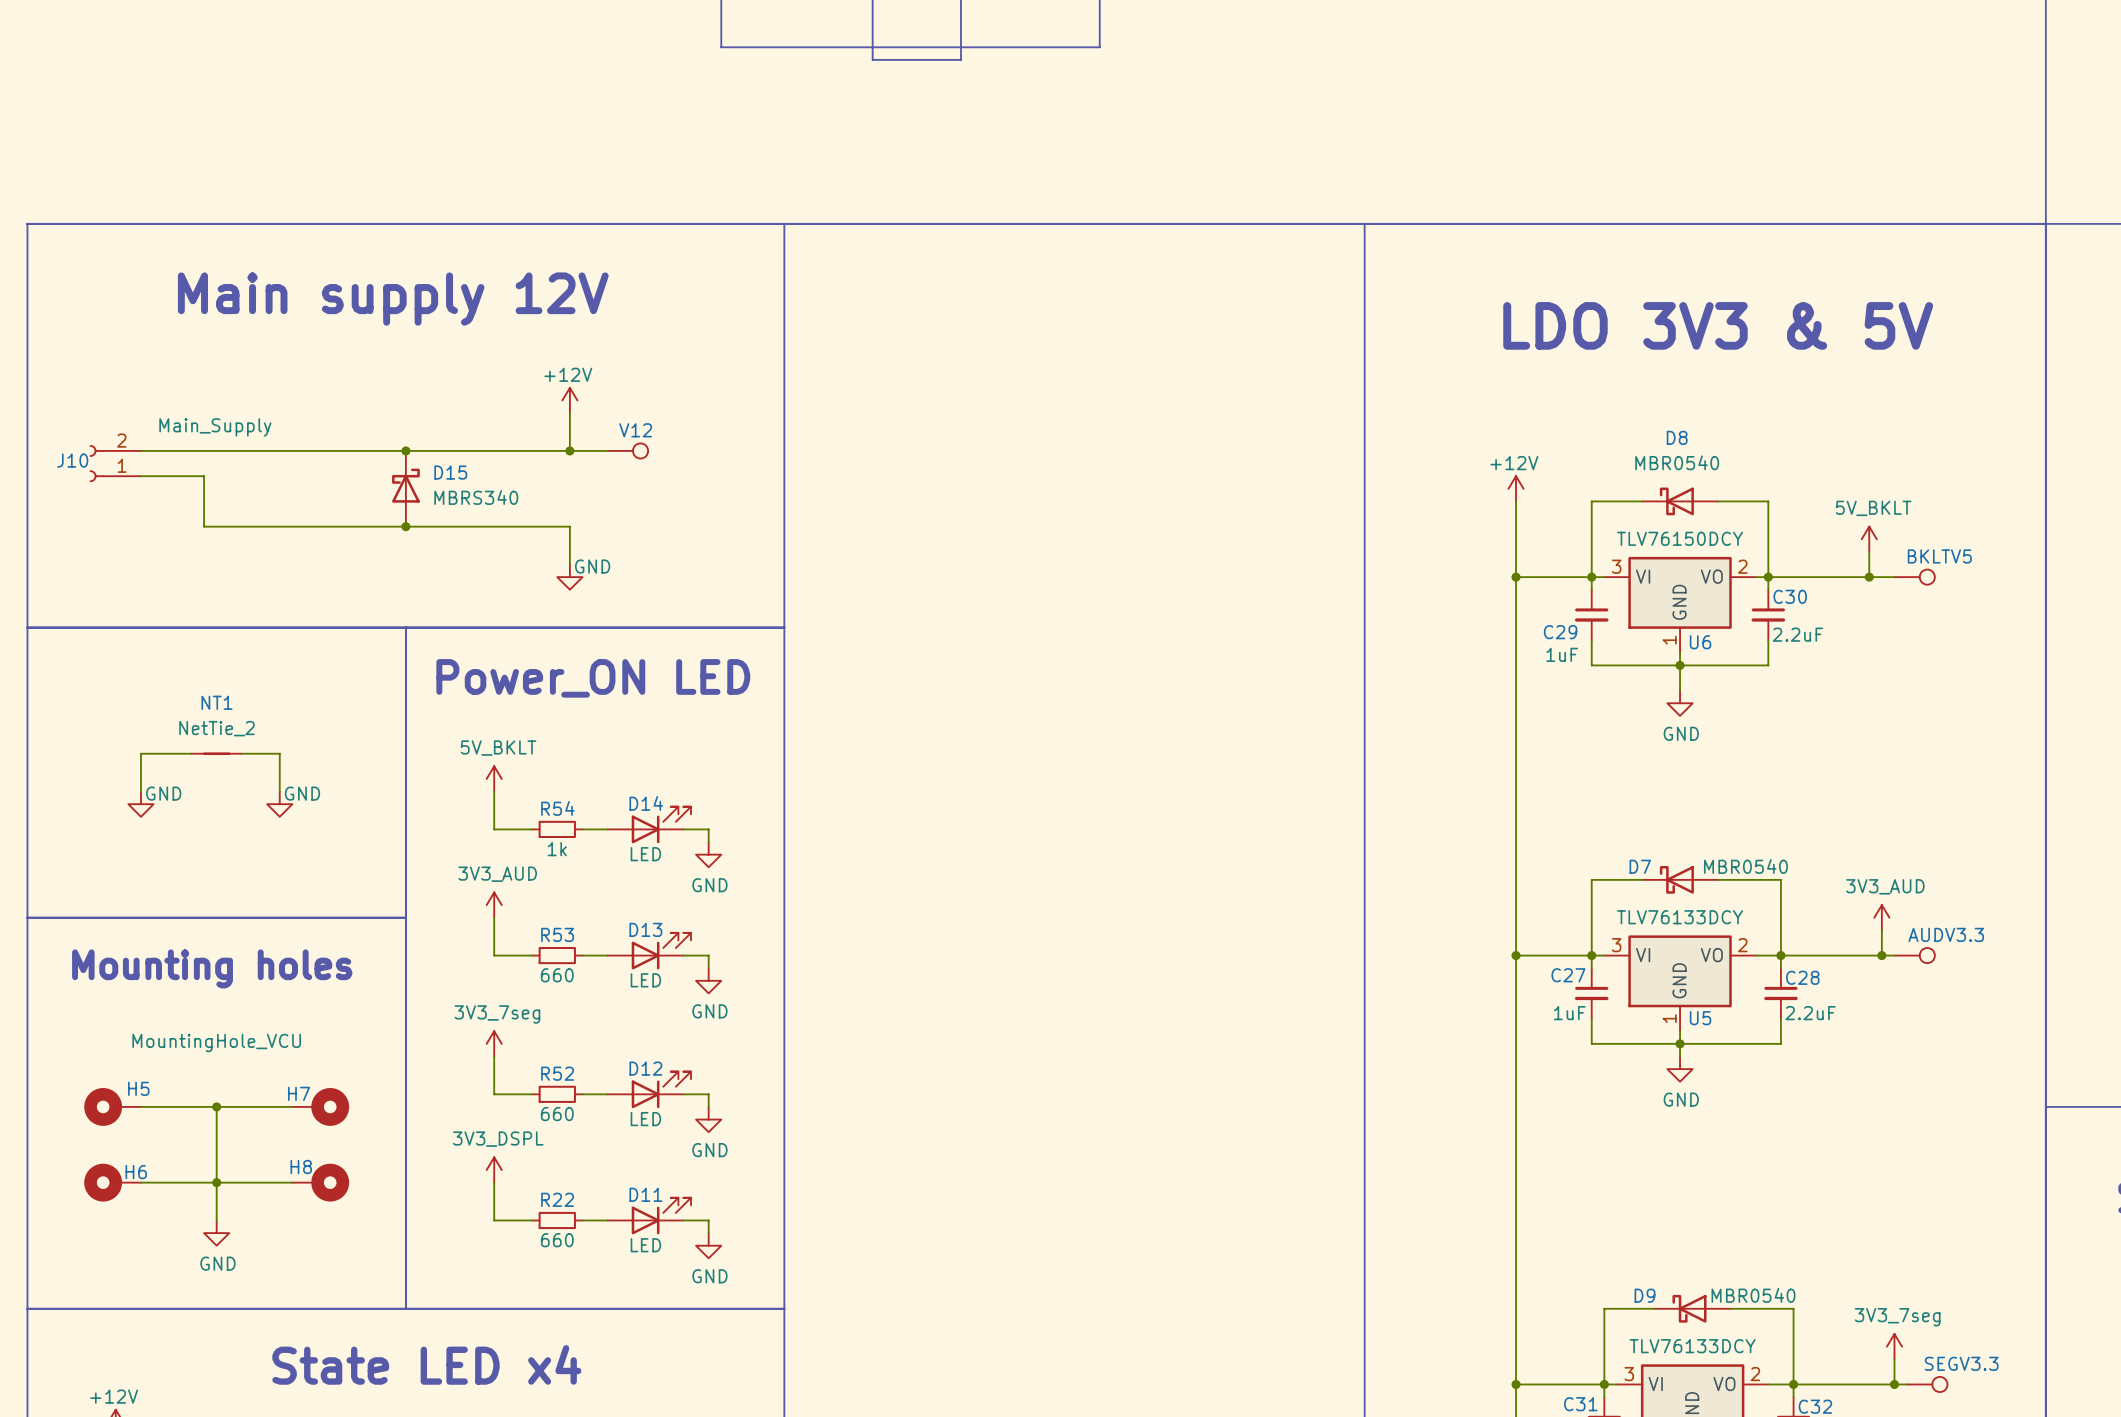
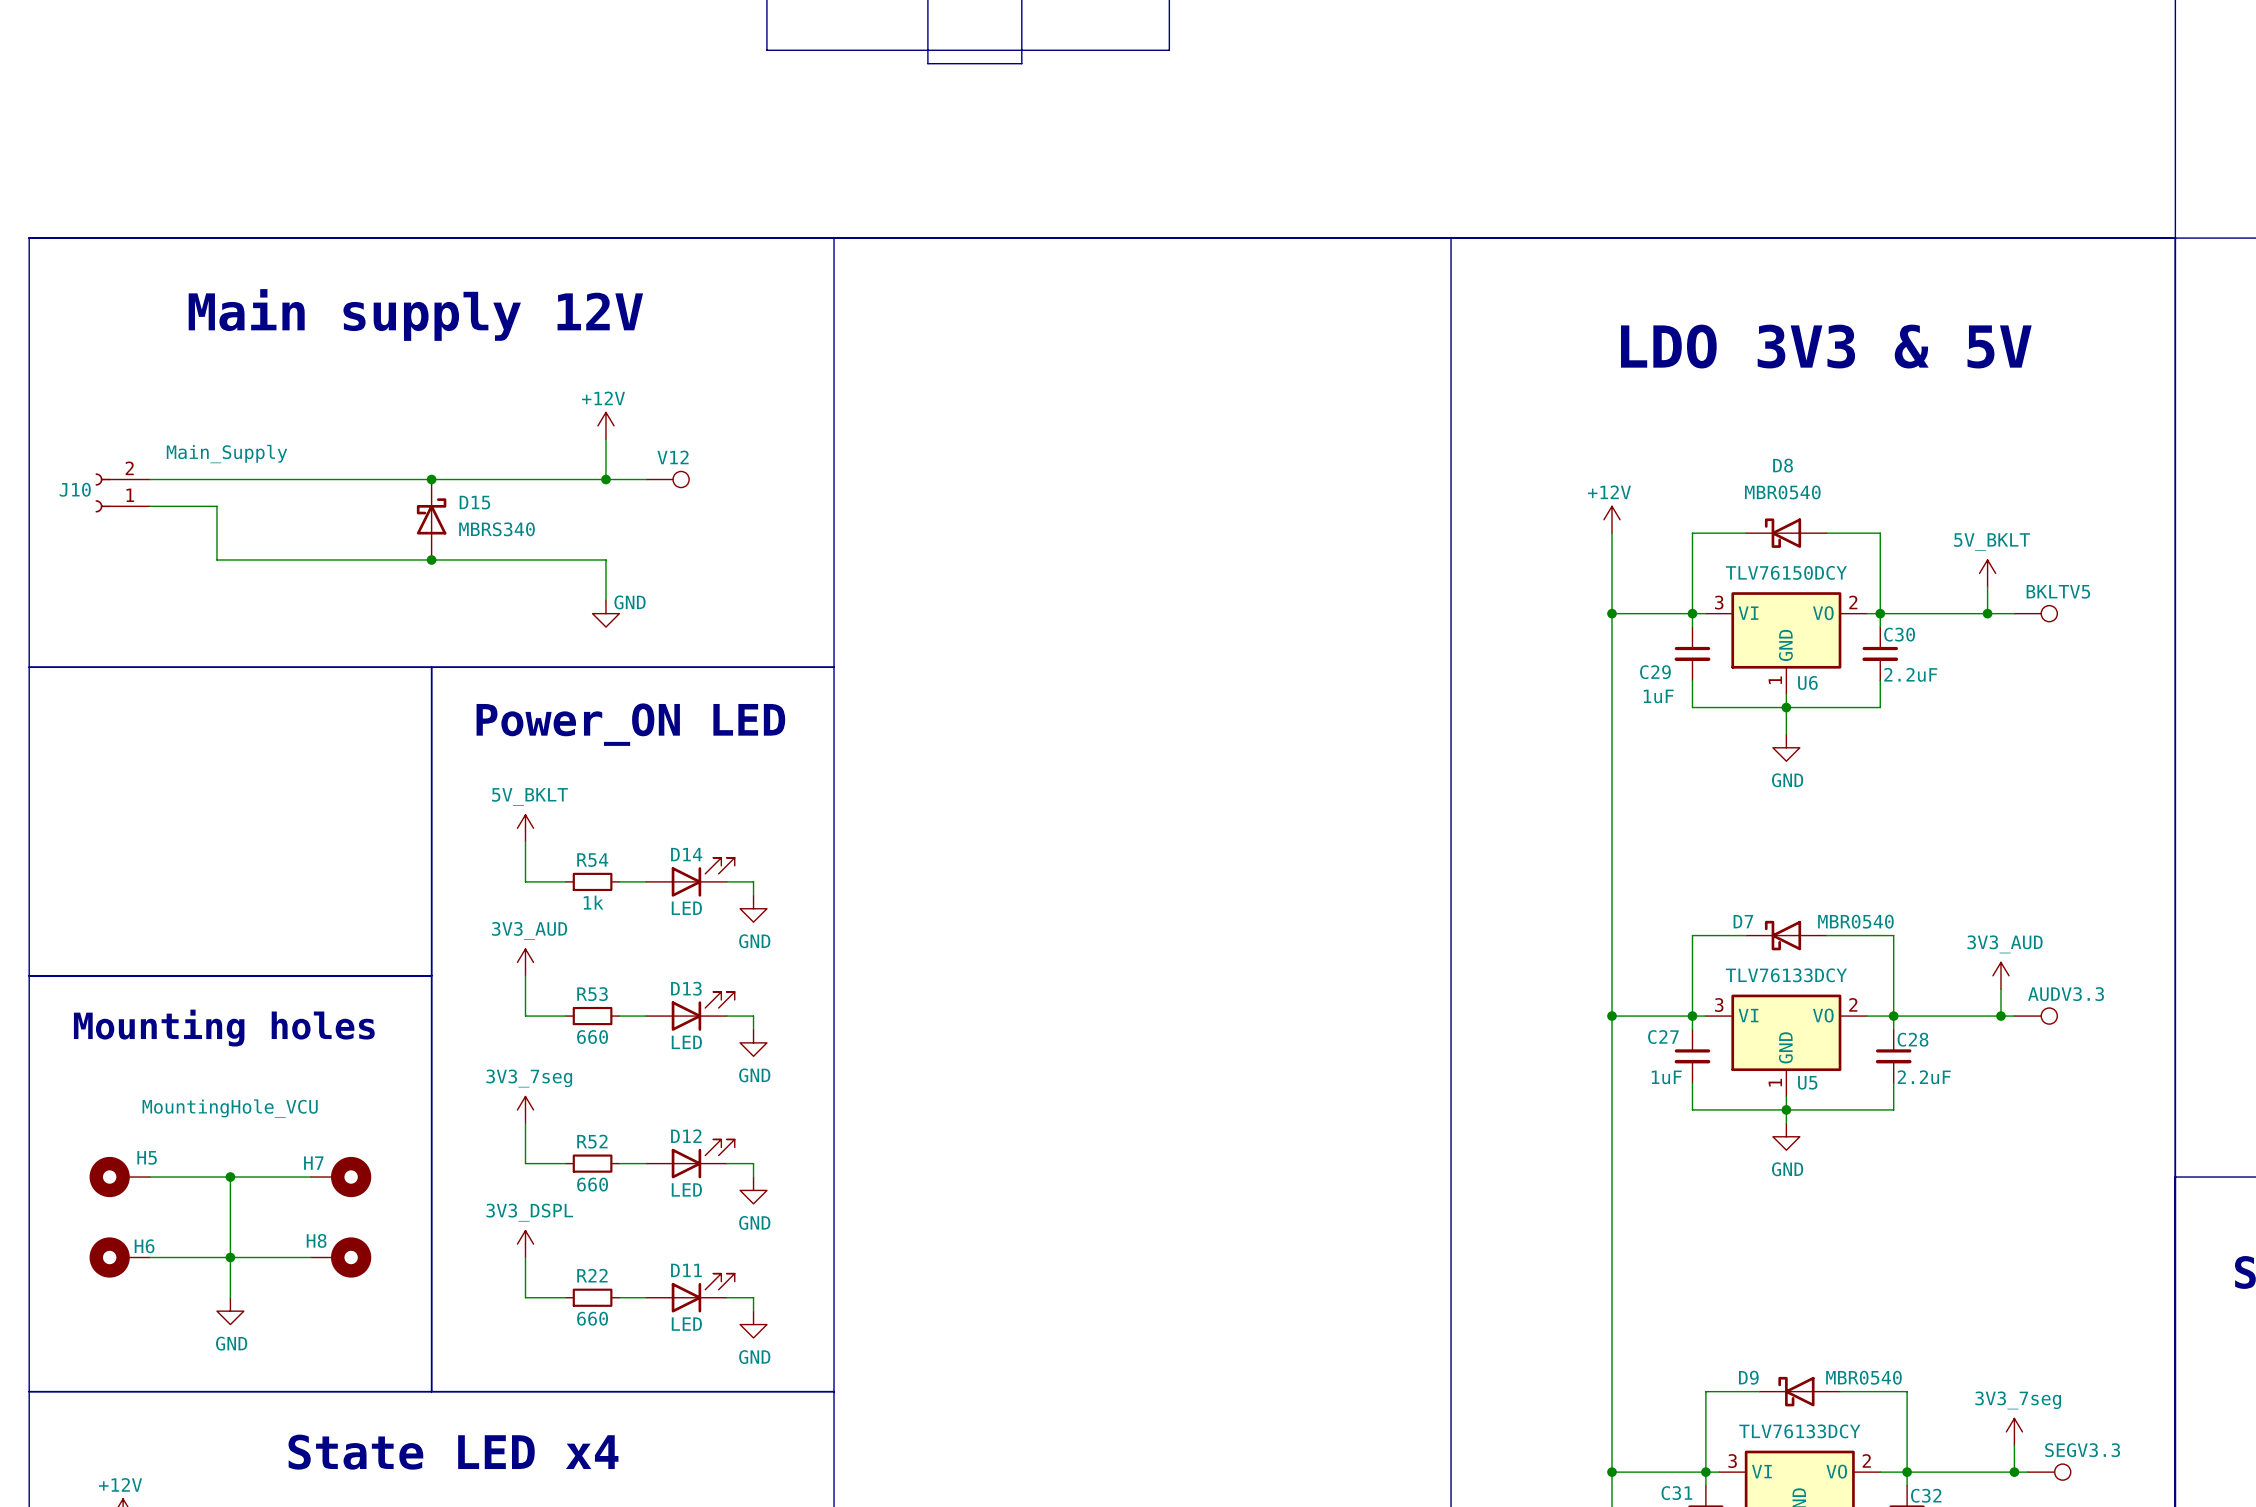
wire: (191, 753) (140, 753) (140, 791) -> none
NT1: NetTie_2 (216, 753) -> none
wire: (241, 753) (279, 753) (279, 791) -> none
power symbol: GND (140, 804) -> none
power symbol: GND (279, 804) -> none

